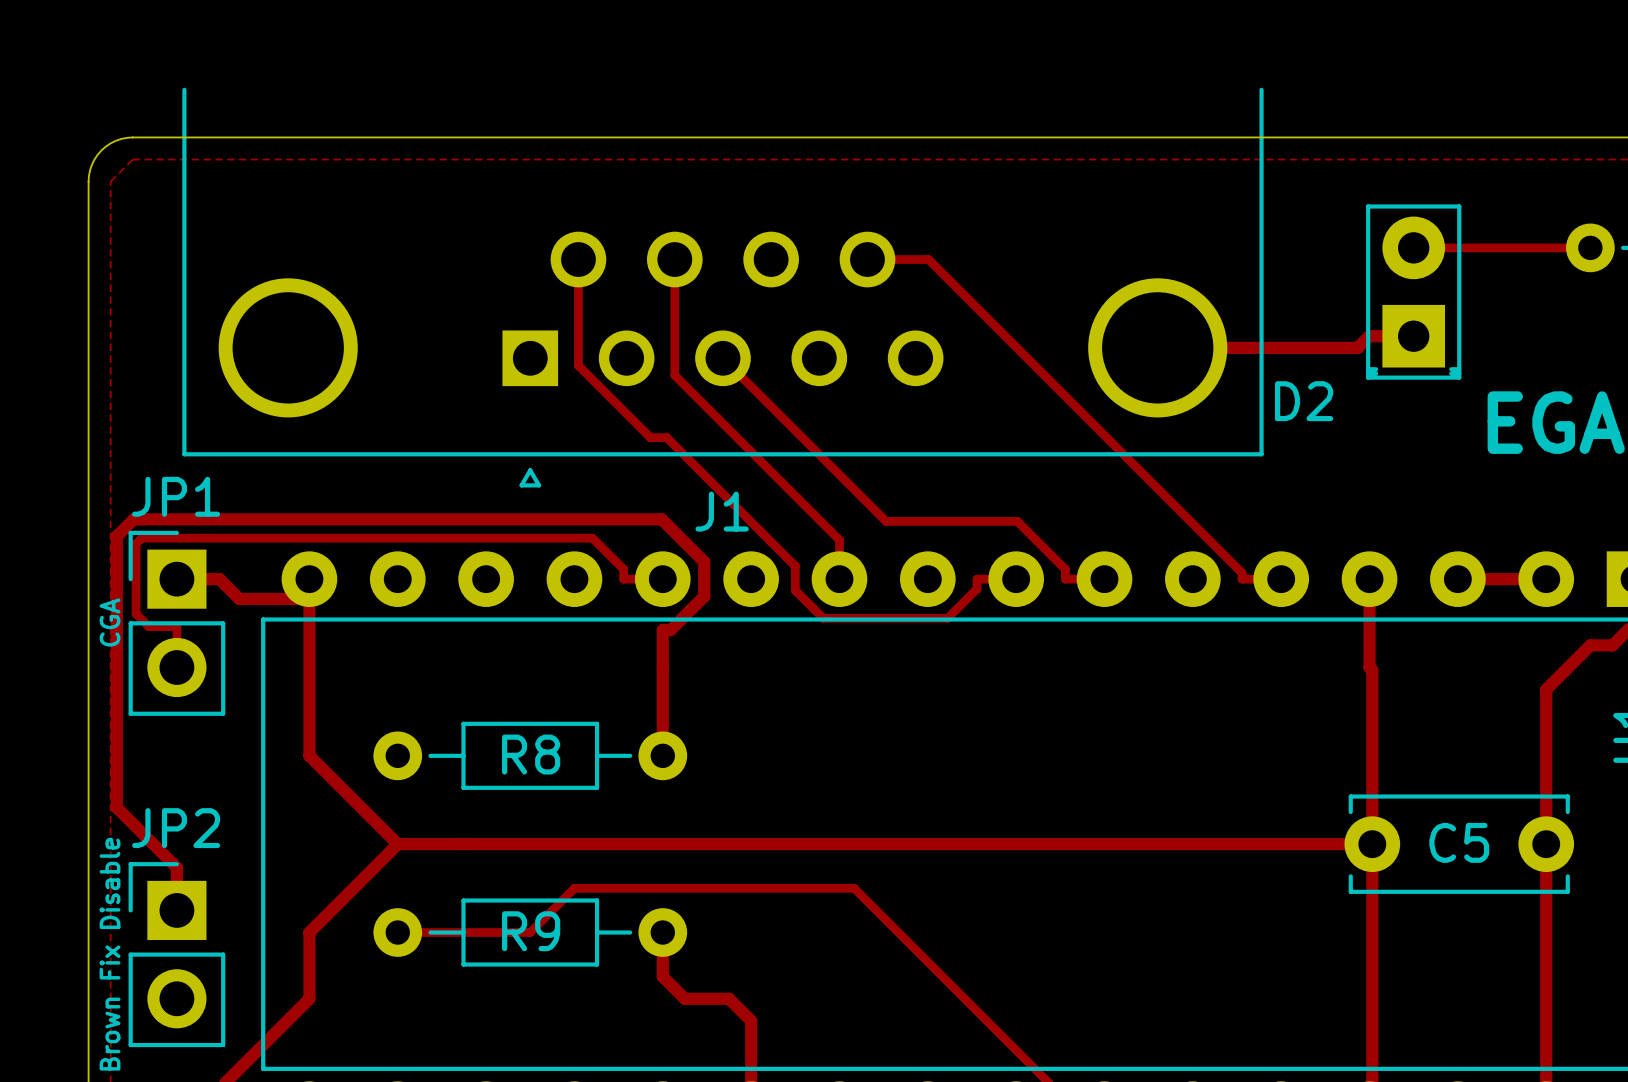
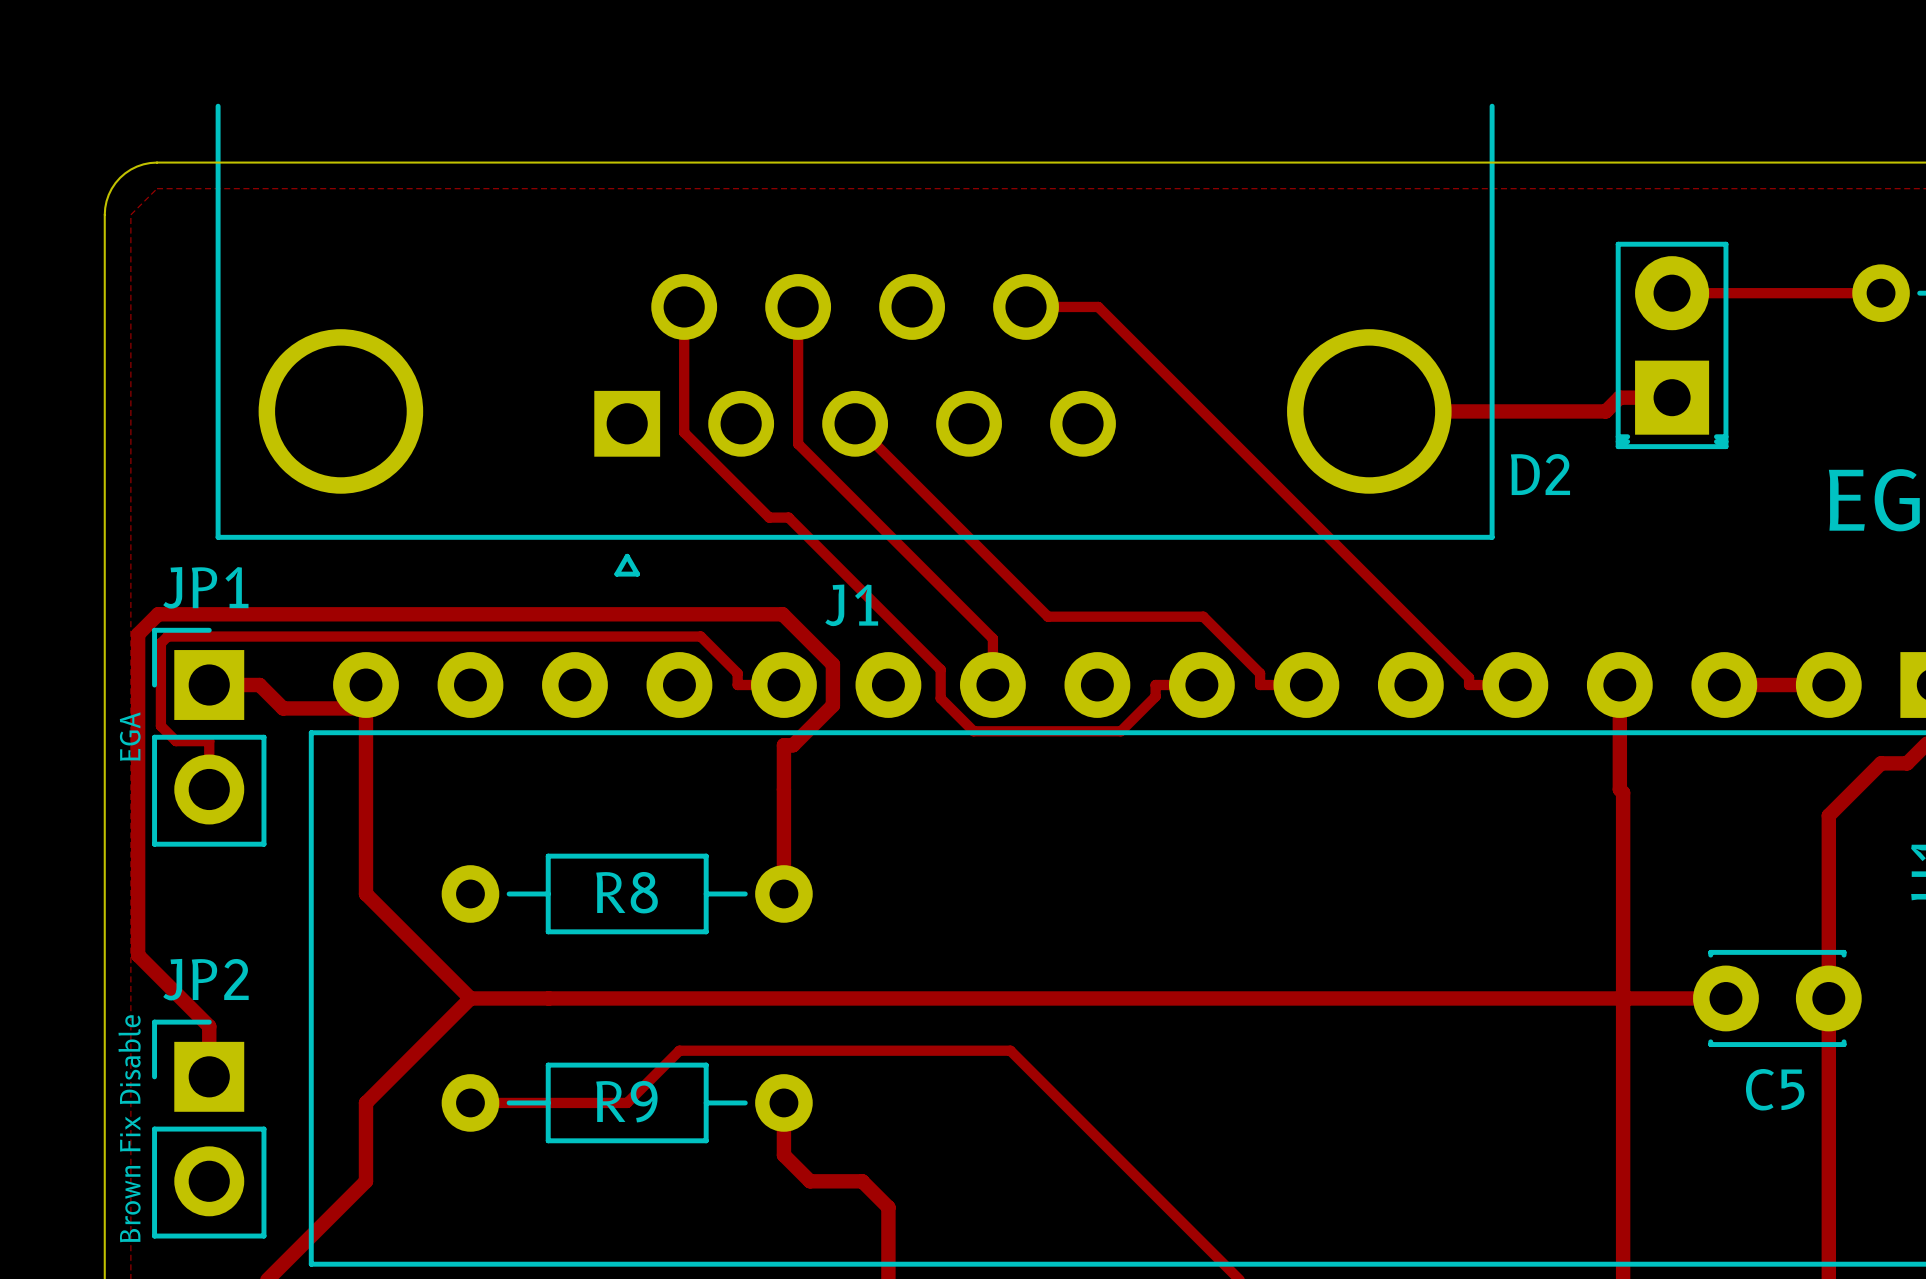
text: CGA (110, 622) -> EGA (130, 736)
C5 footprint: [1344, 794, 1575, 894] -> [1693, 949, 1862, 1048]
C5 name position: C5 (1459, 842) -> C5 (1775, 1089)
track: none -> (1623, 998) (1725, 998)

